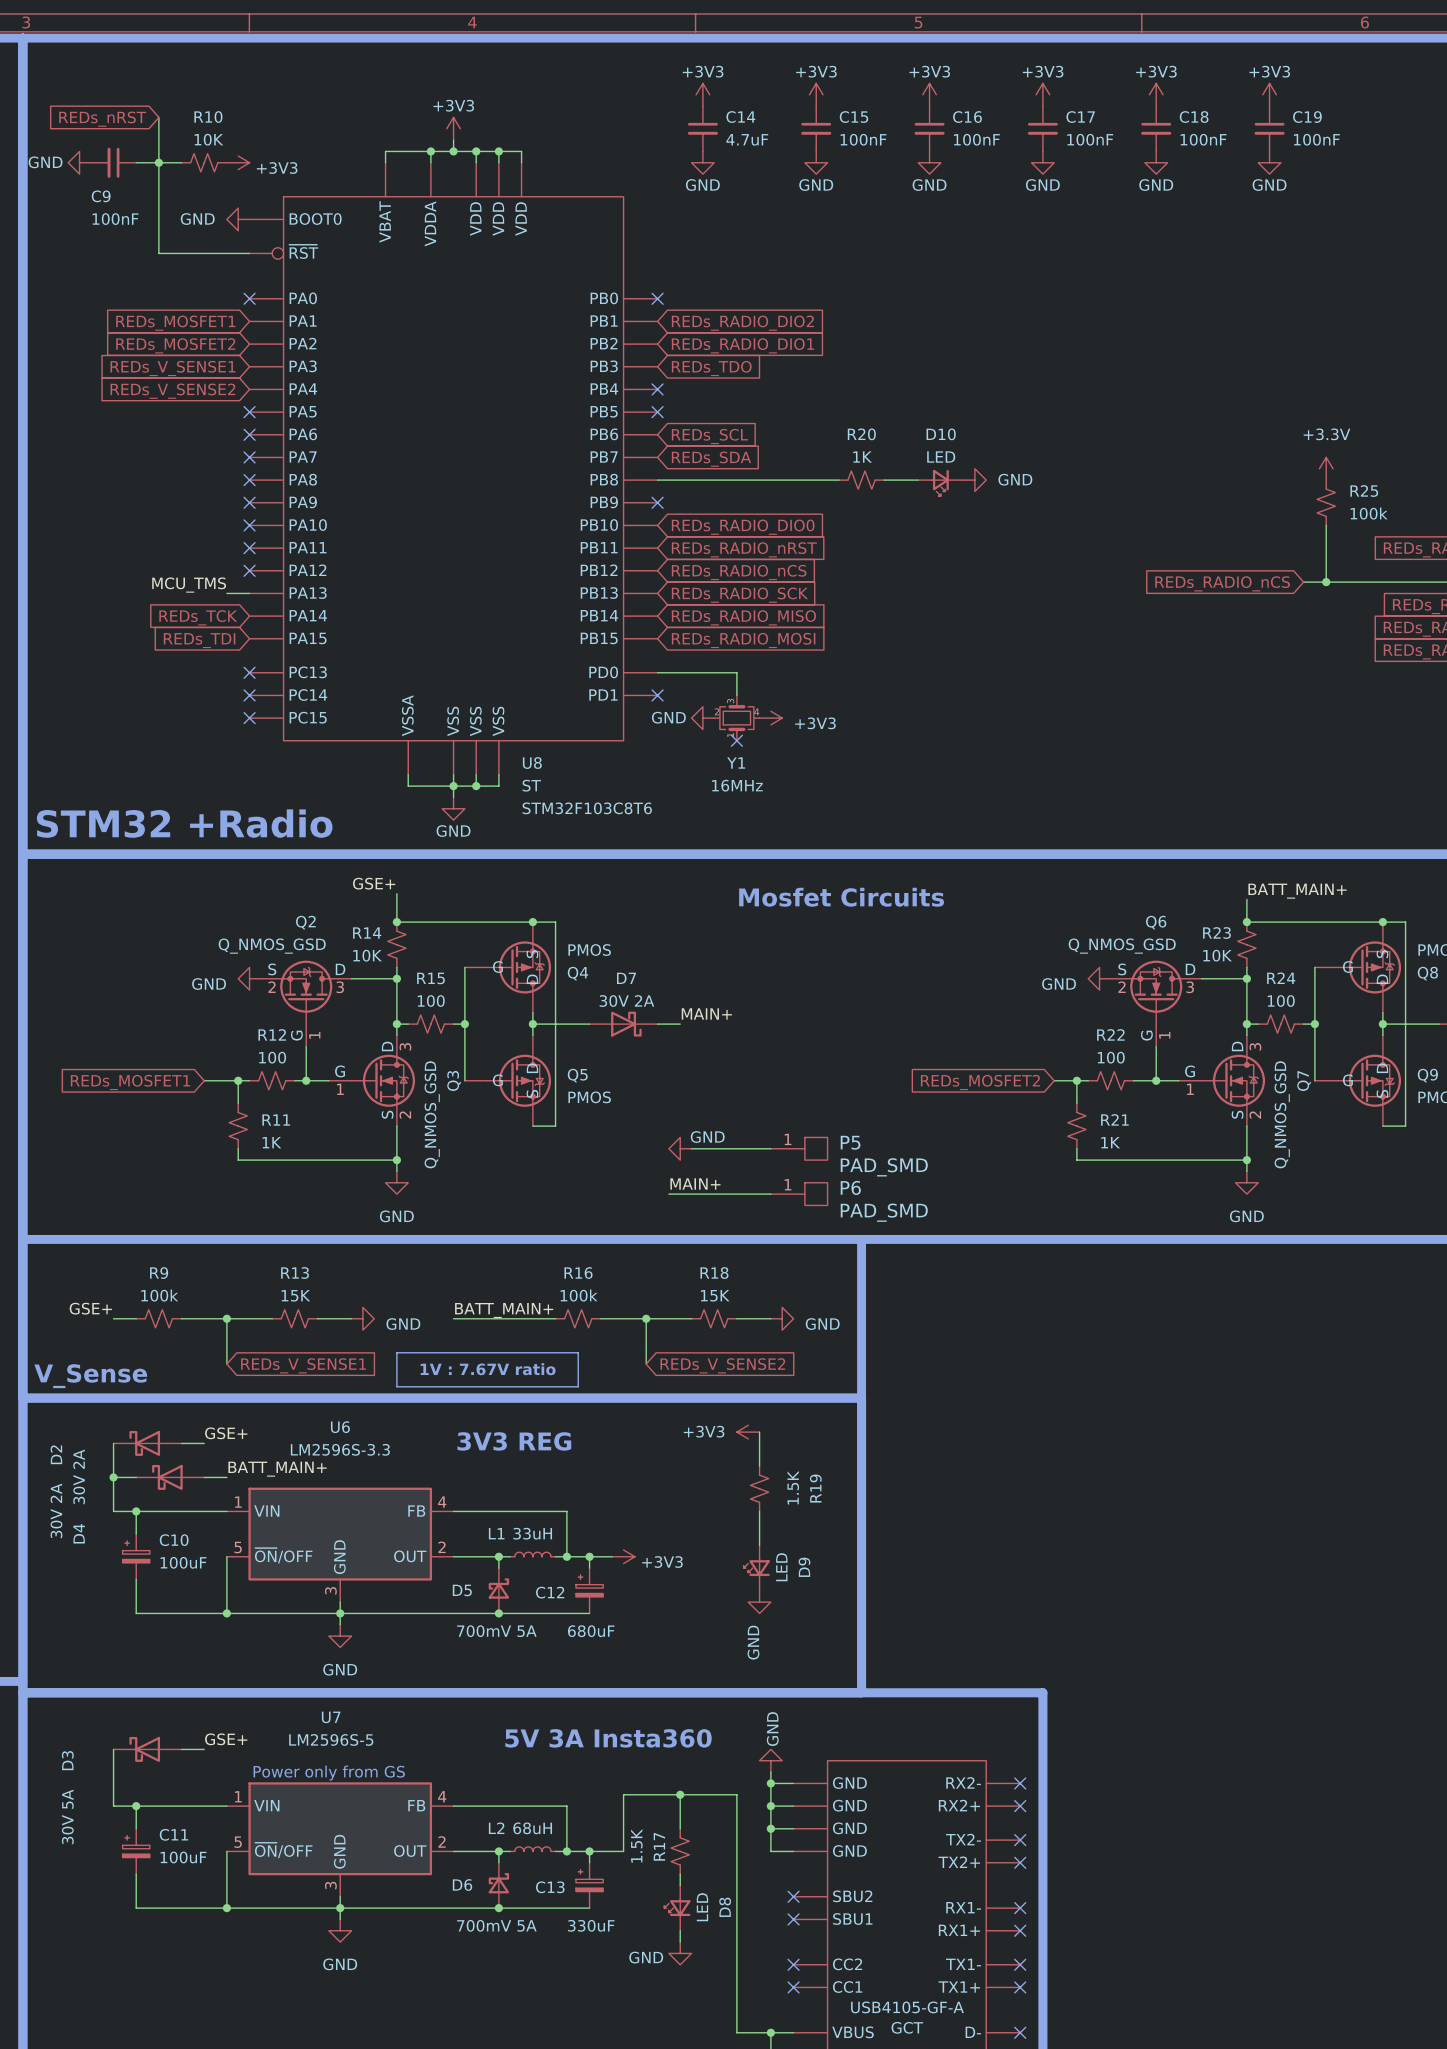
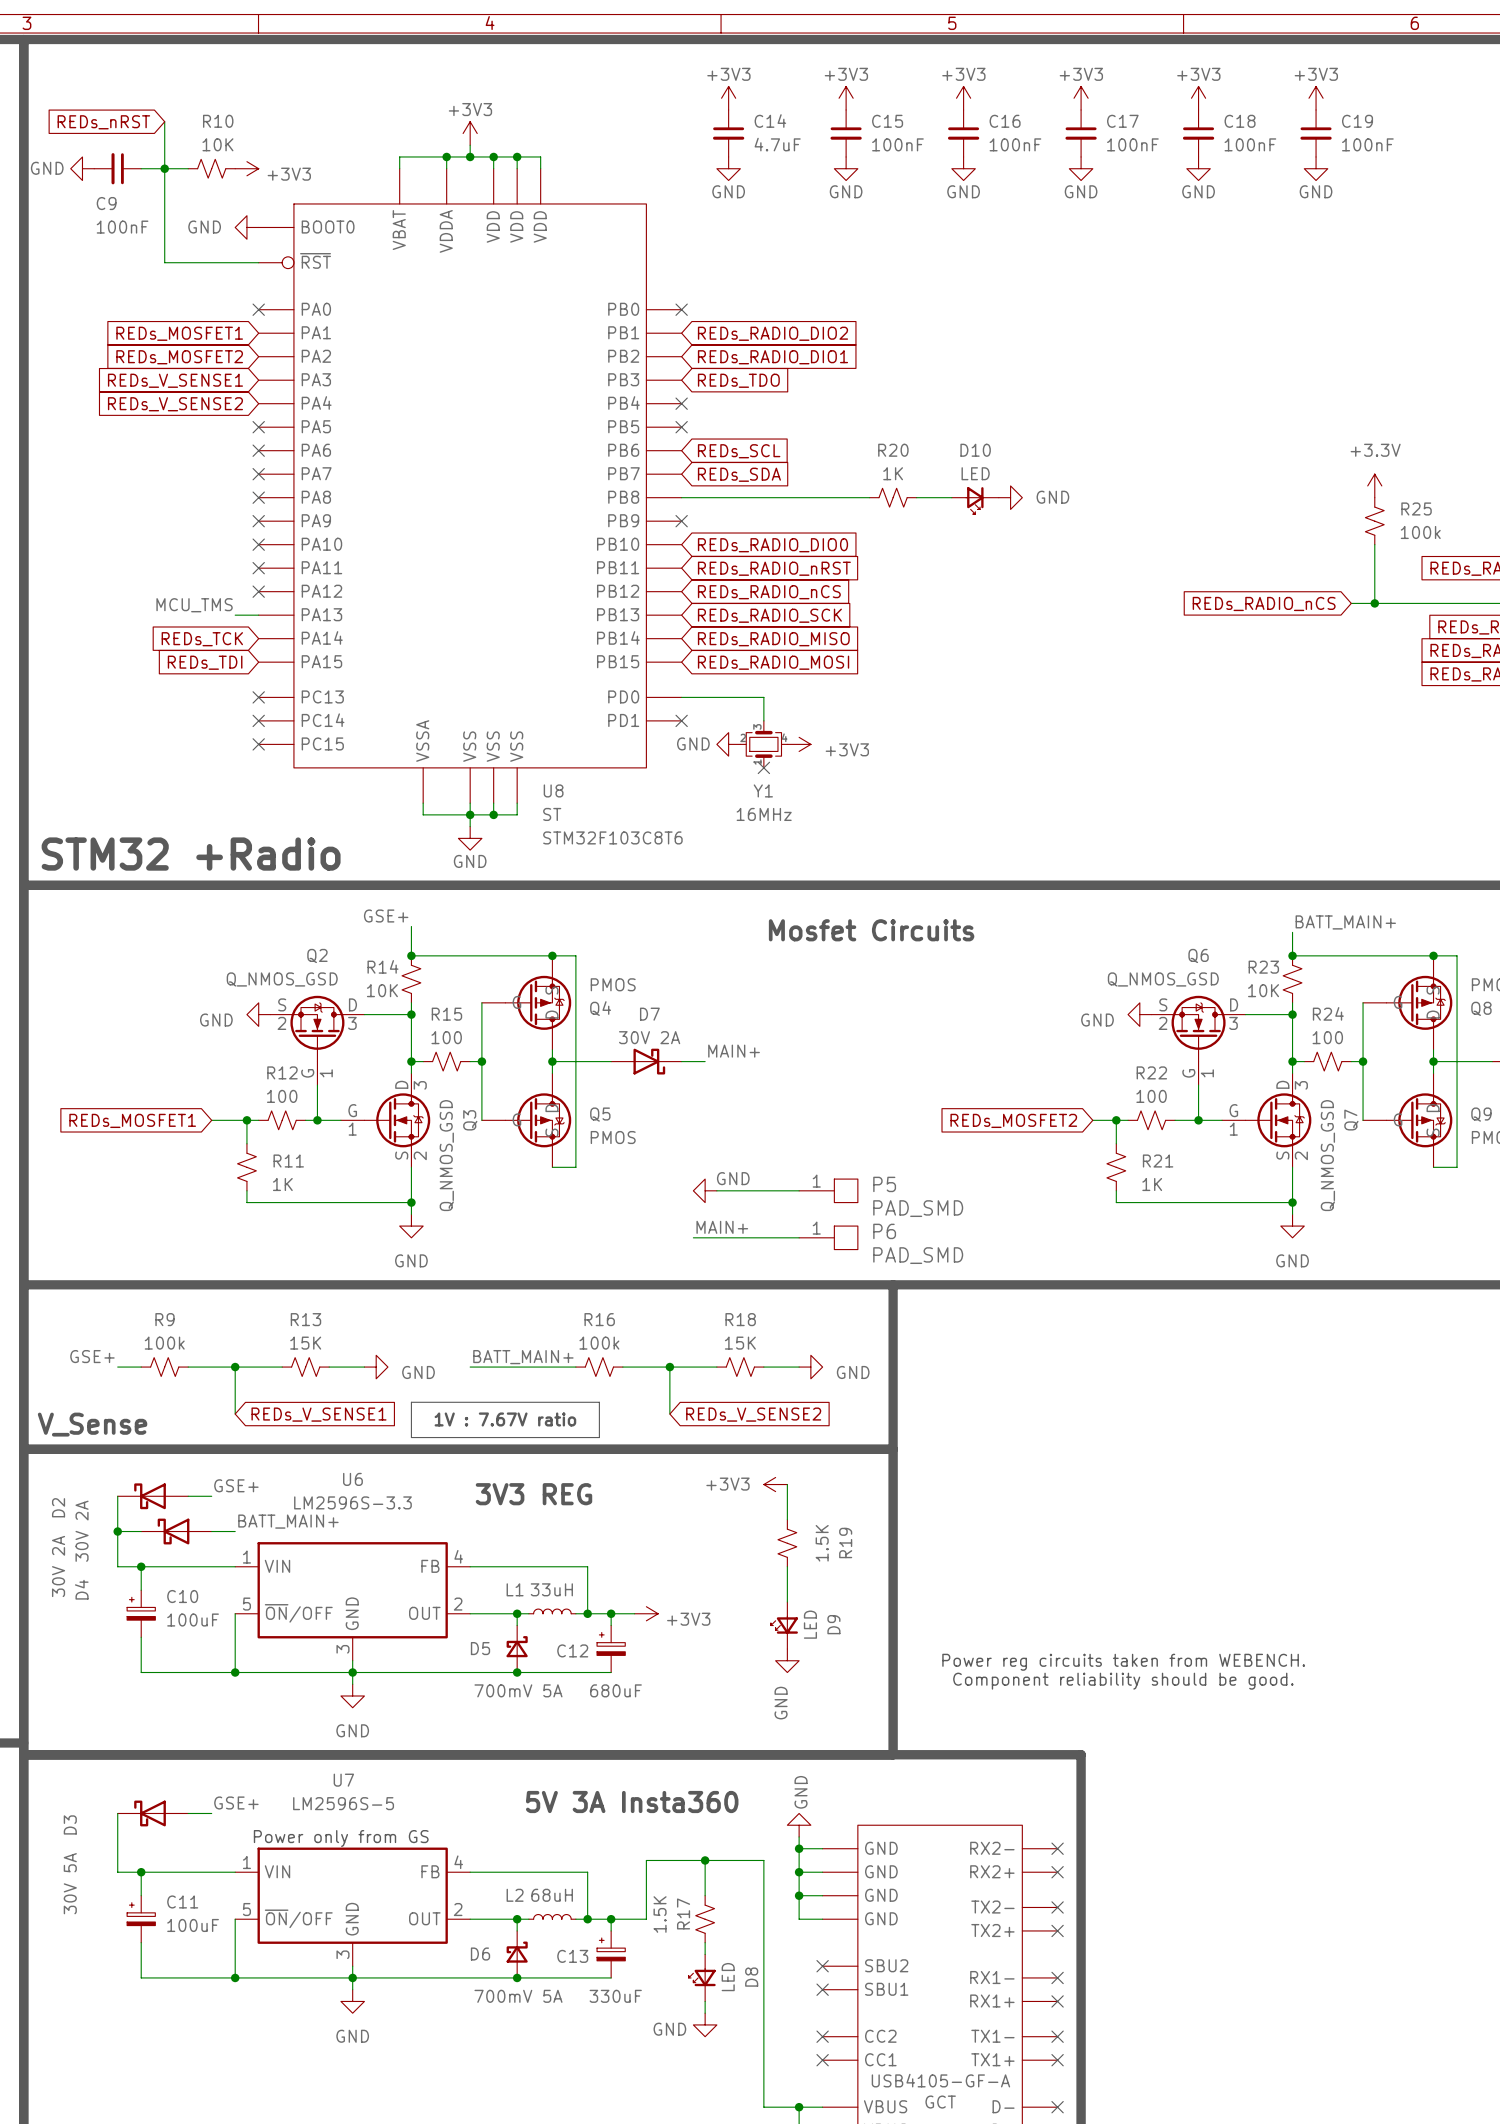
text: none -> Power reg circuits taken from WEBENCH. (1123, 1662)
text: none -> Component reliability should be good. (1123, 1681)

